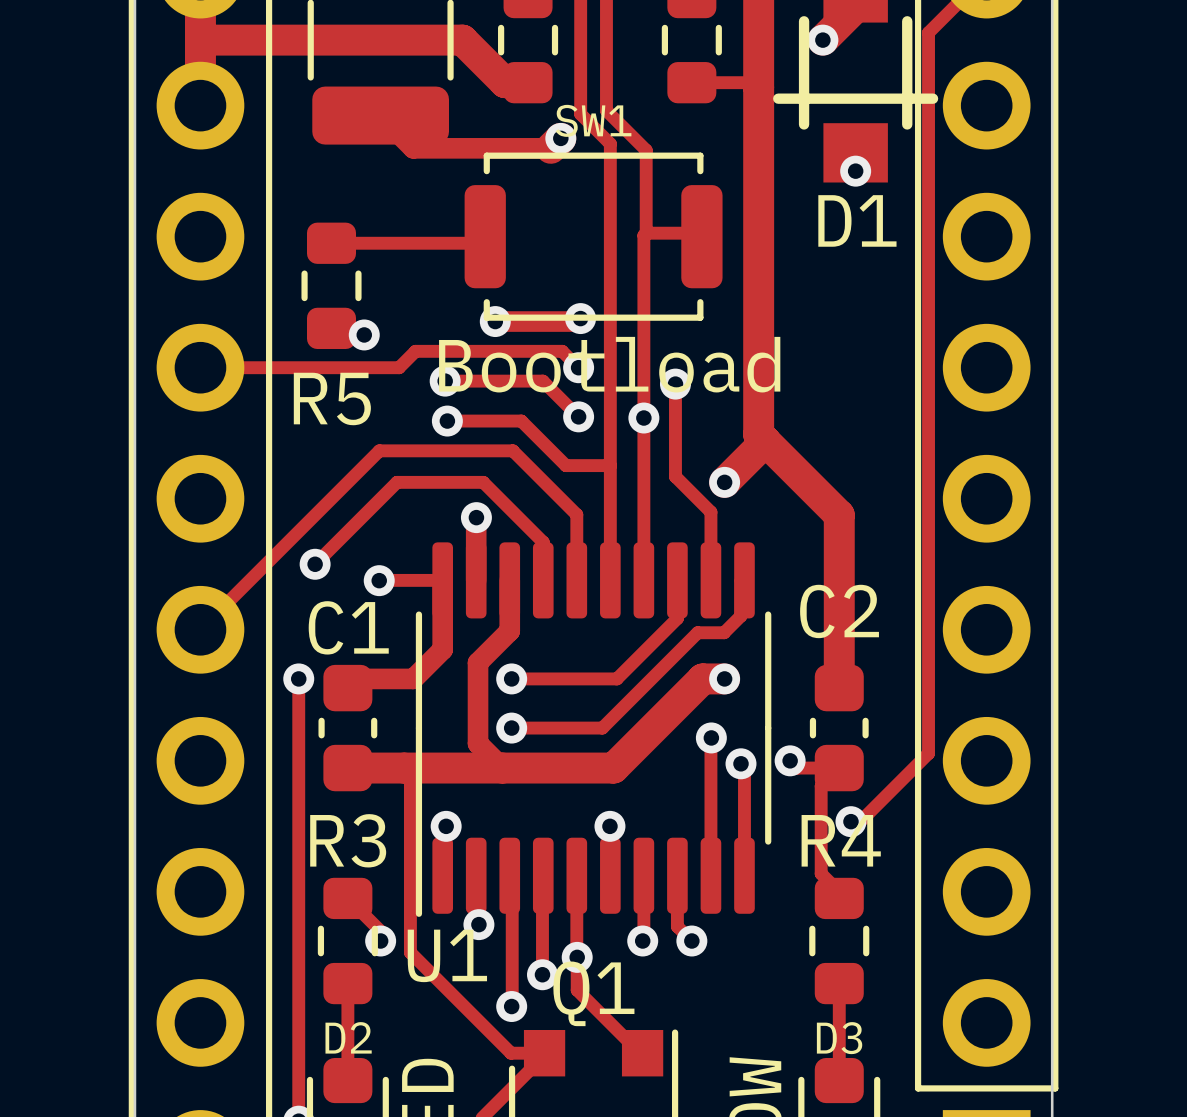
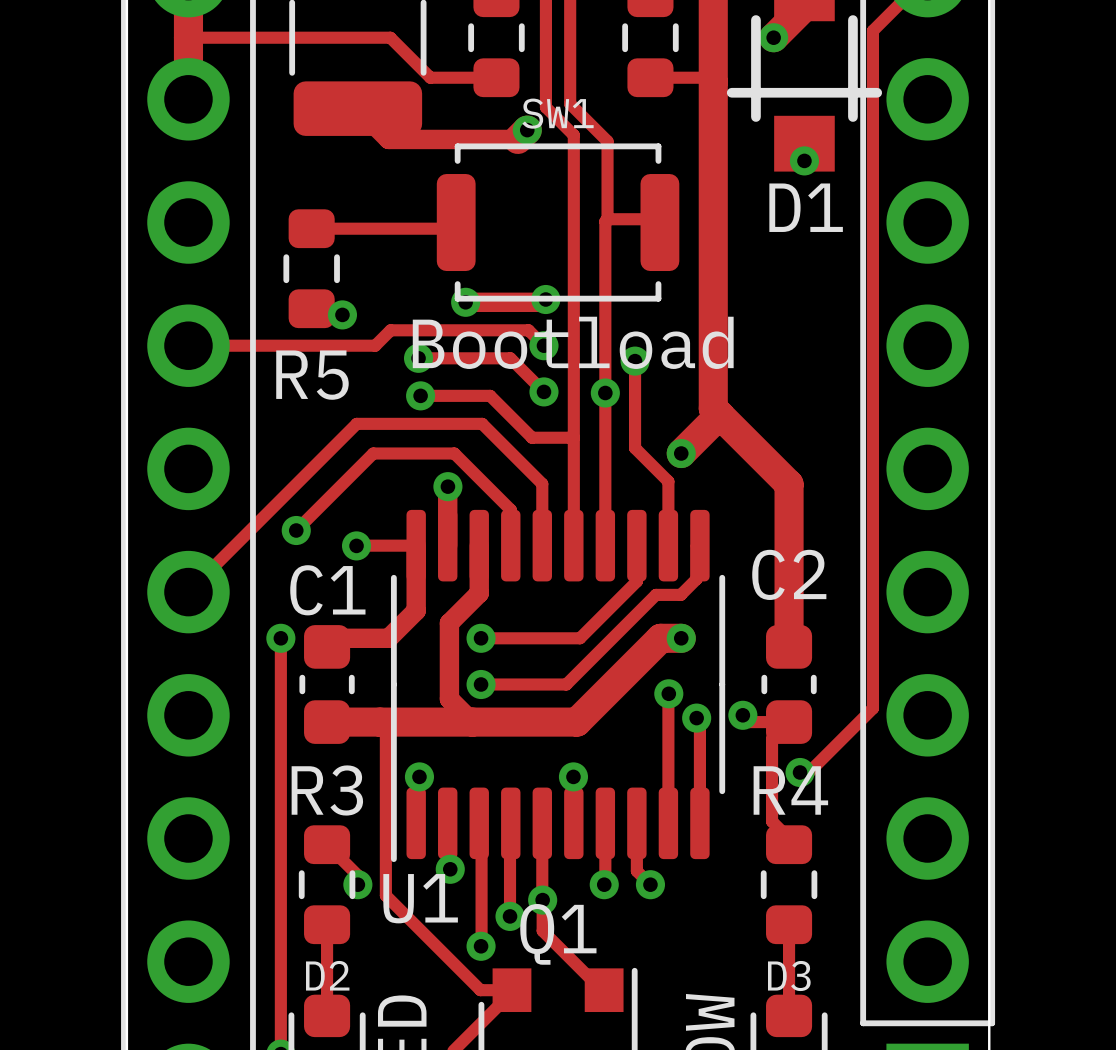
track width: thick (200, 40) (415, 40) -> thin (188, 37) (390, 37)
track: (415, 40) (462, 40) (505, 82) -> (390, 37) (430, 77) (474, 77)

